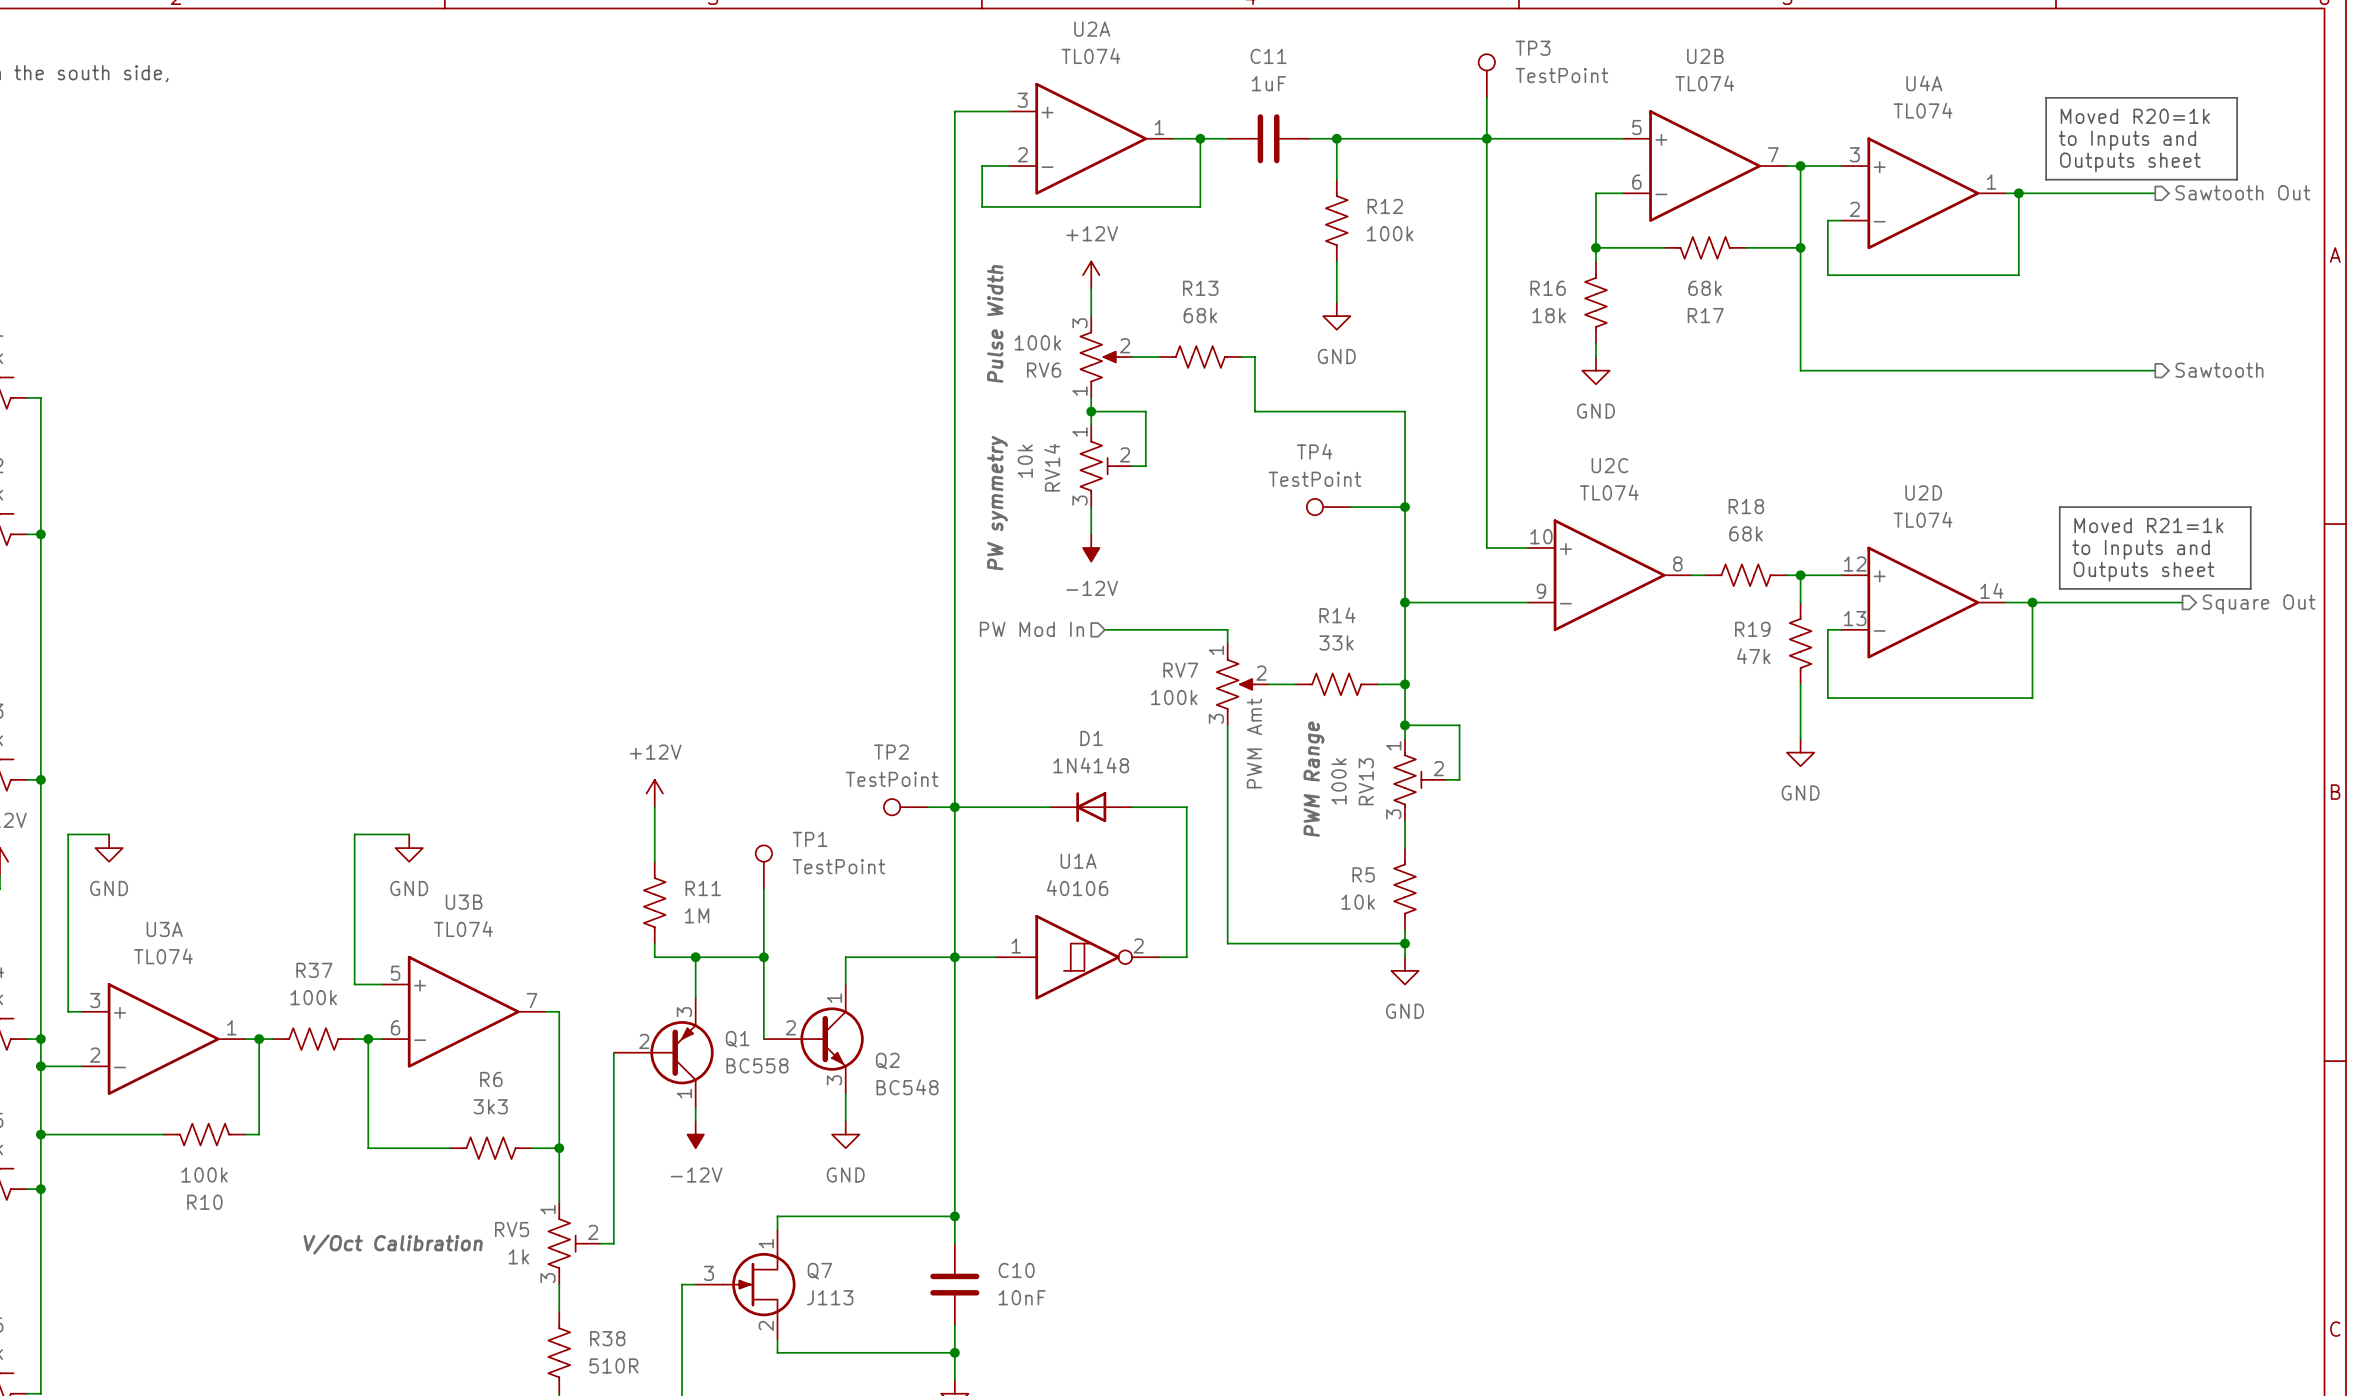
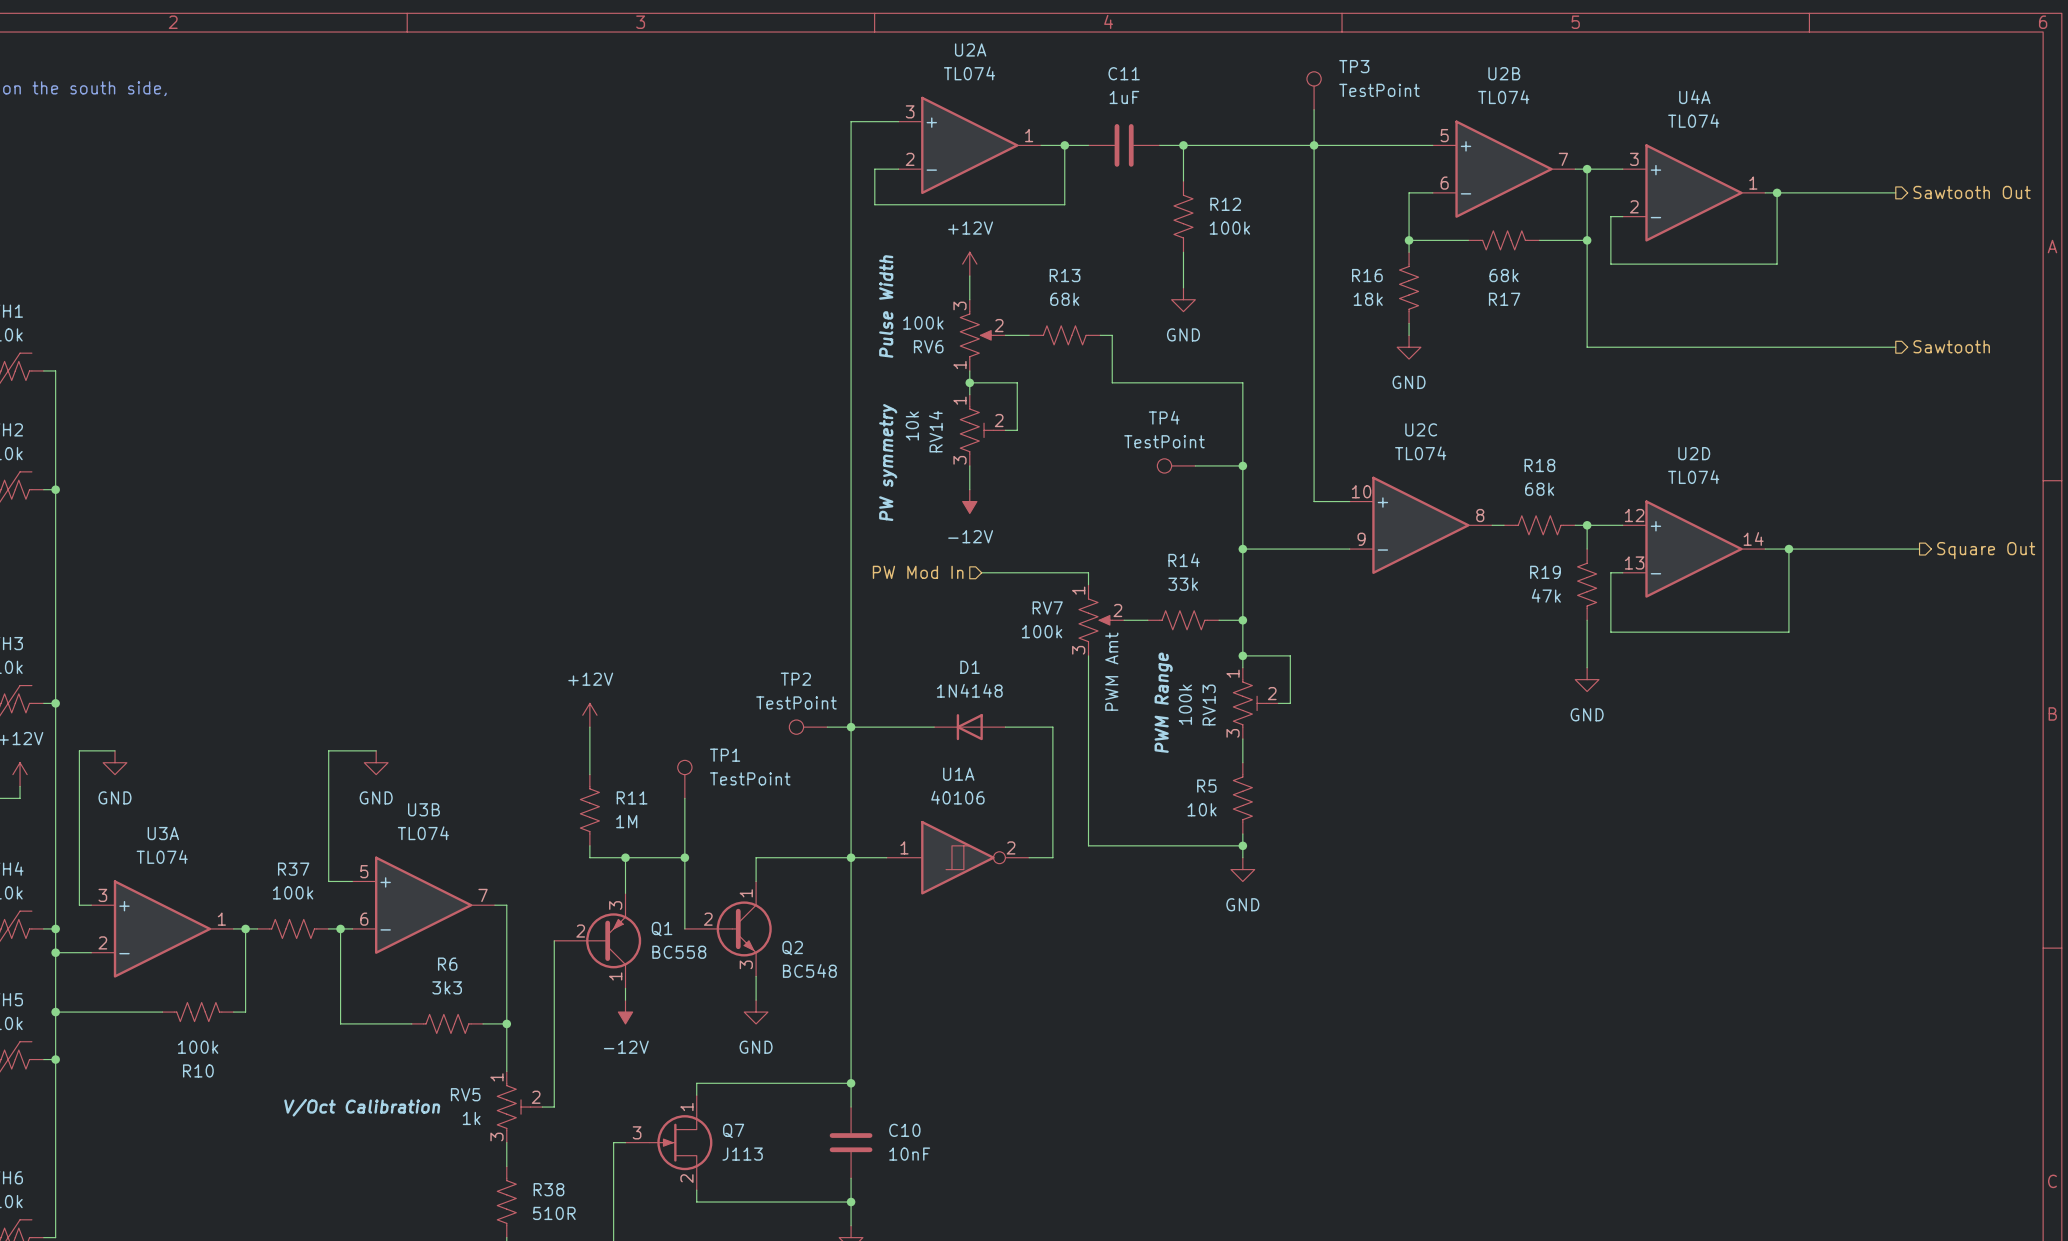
line: (2046, 97) (2237, 97) (2237, 179) (2046, 179) (2046, 97) -> none
text: Moved R20=1k (2135, 116) -> none
text: to Inputs and (2127, 140) -> none
text: Outputs sheet (2130, 162) -> none
line: (2059, 507) (2250, 507) (2250, 588) (2059, 588) (2059, 507) -> none
text: Moved R21=1k (2148, 525) -> none
text: to Inputs and (2141, 549) -> none
text: Outputs sheet (2143, 571) -> none

